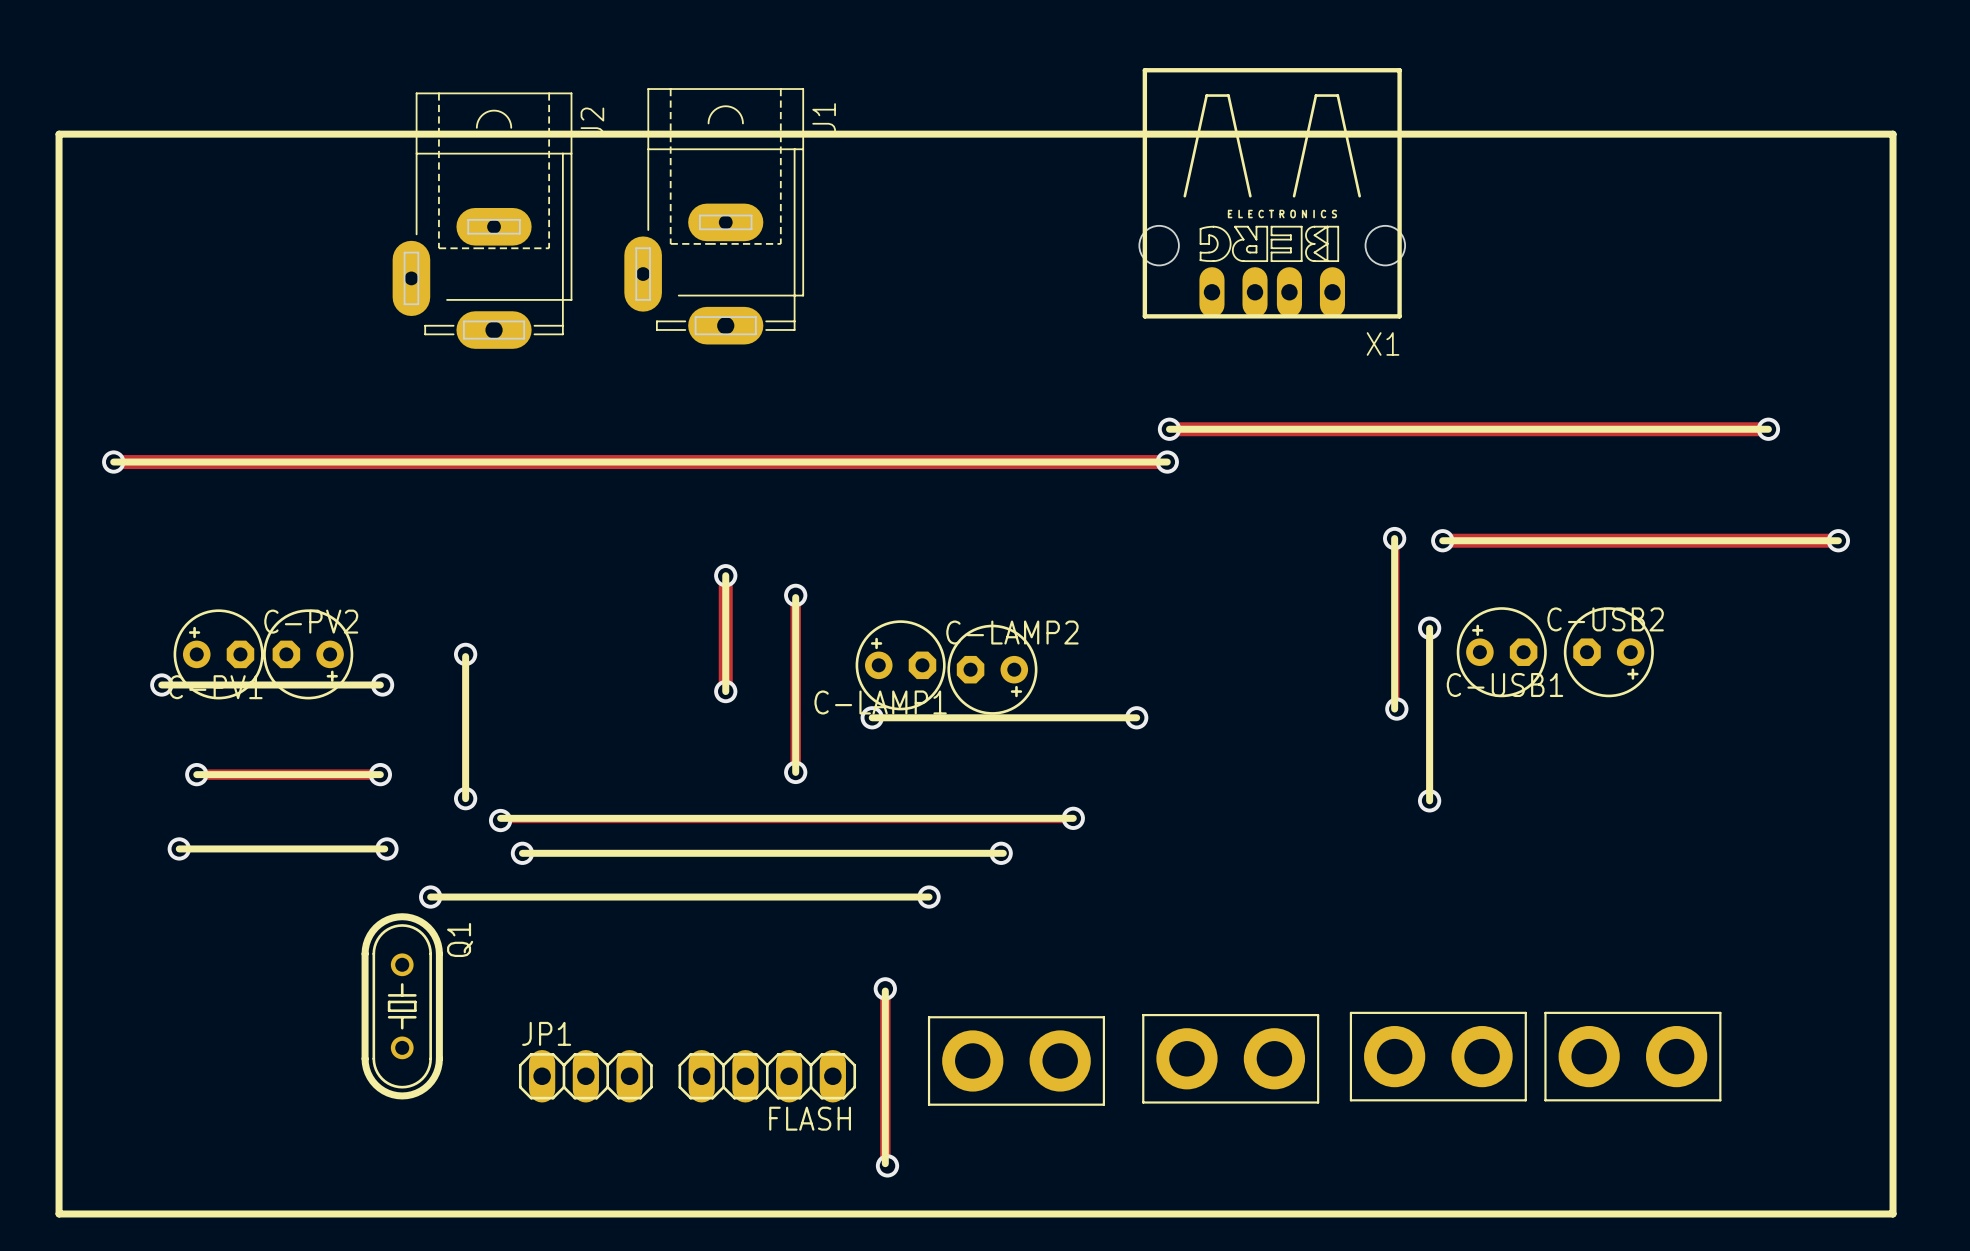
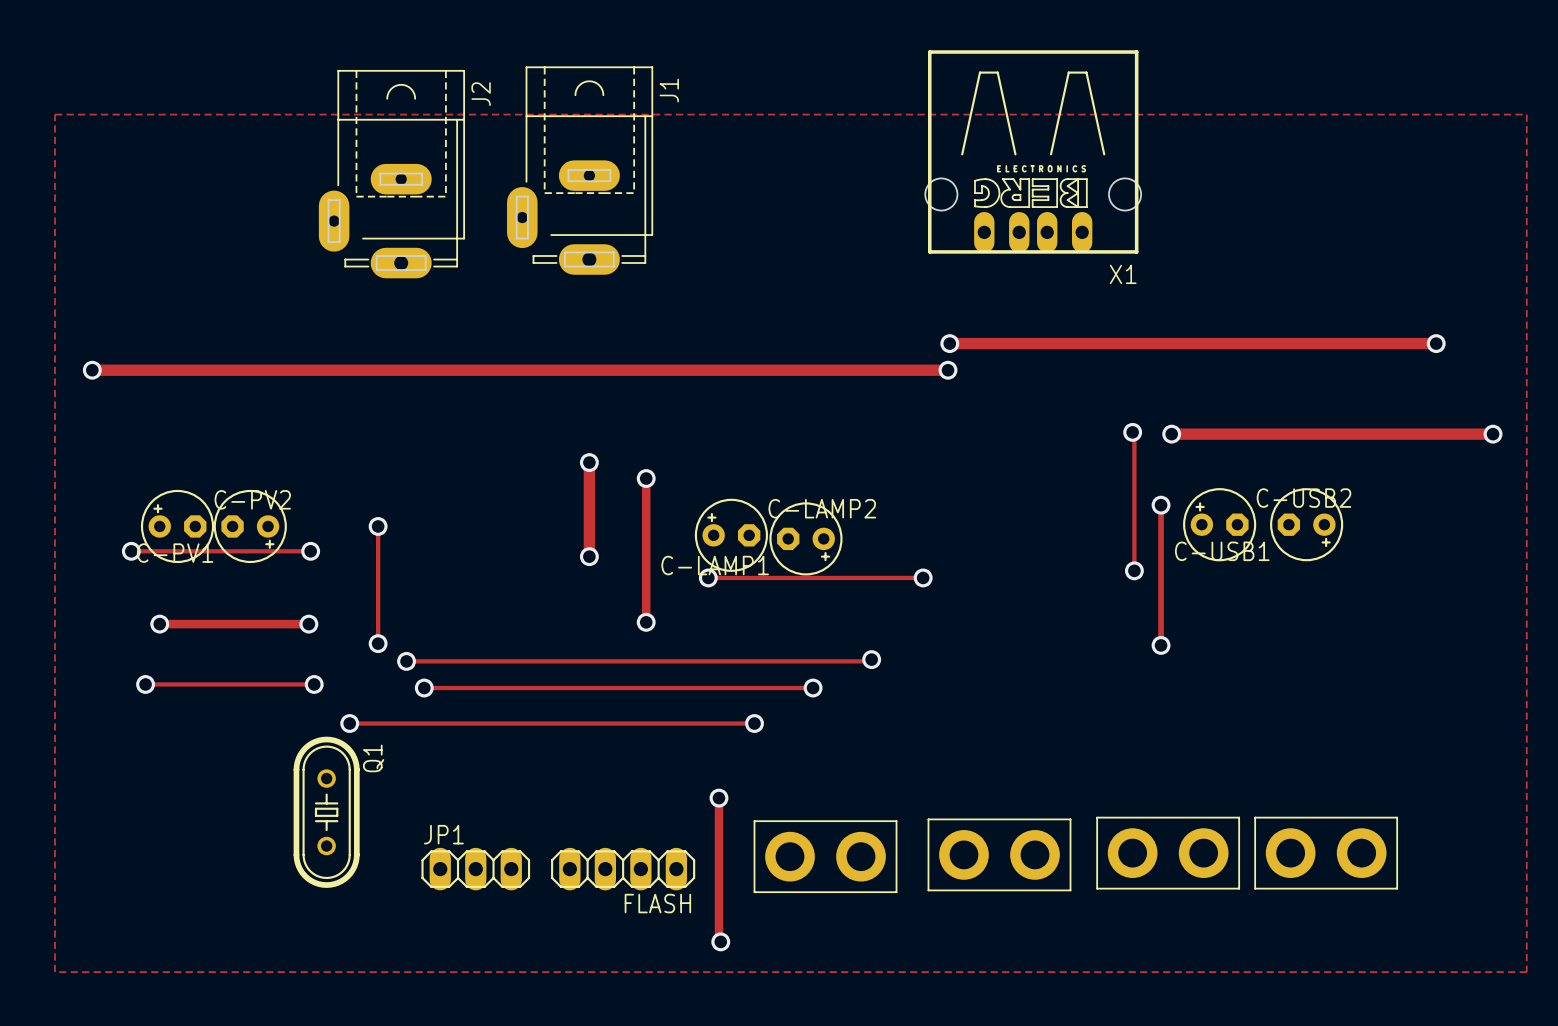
line: (59, 134) (1893, 134) (1893, 1213) (59, 1213) (59, 134) -> none
zone outline: none -> (55, 114) (1526, 114) (1526, 972) (55, 972) (55, 114)
line: (1169, 429) (1768, 429) -> none
line: (113, 462) (1167, 462) -> none
line: (1394, 538) (1394, 709) -> none
line: (1442, 540) (1838, 540) -> none
line: (725, 575) (725, 691) -> none
line: (795, 597) (795, 772) -> none
line: (1429, 628) (1429, 800) -> none
line: (465, 656) (465, 798) -> none
line: (161, 684) (380, 684) -> none
line: (872, 717) (1136, 717) -> none
line: (196, 774) (380, 774) -> none
line: (500, 818) (1073, 818) -> none
line: (179, 848) (384, 848) -> none
line: (522, 853) (1003, 853) -> none
line: (430, 897) (929, 897) -> none
line: (885, 991) (885, 1163) -> none

